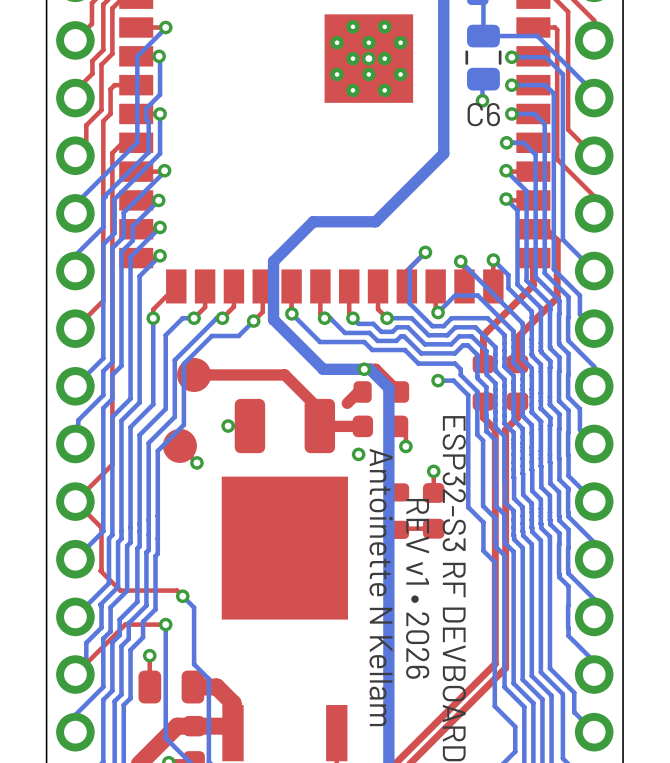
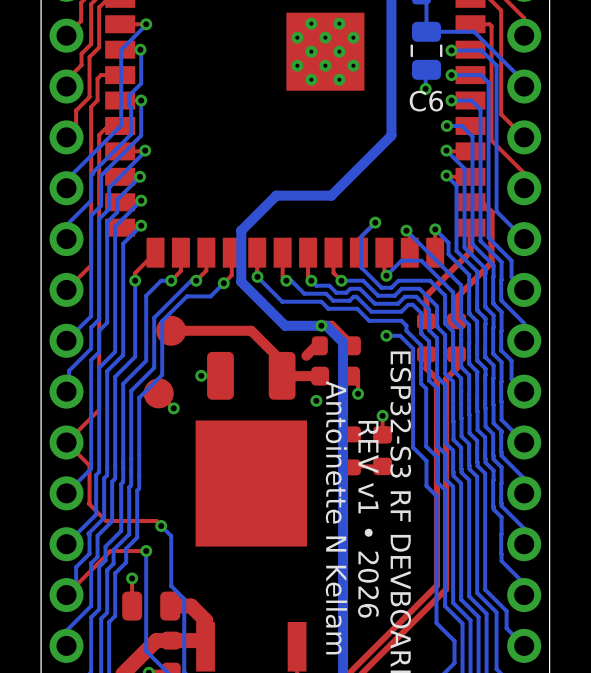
via: (368, 58) -> none

